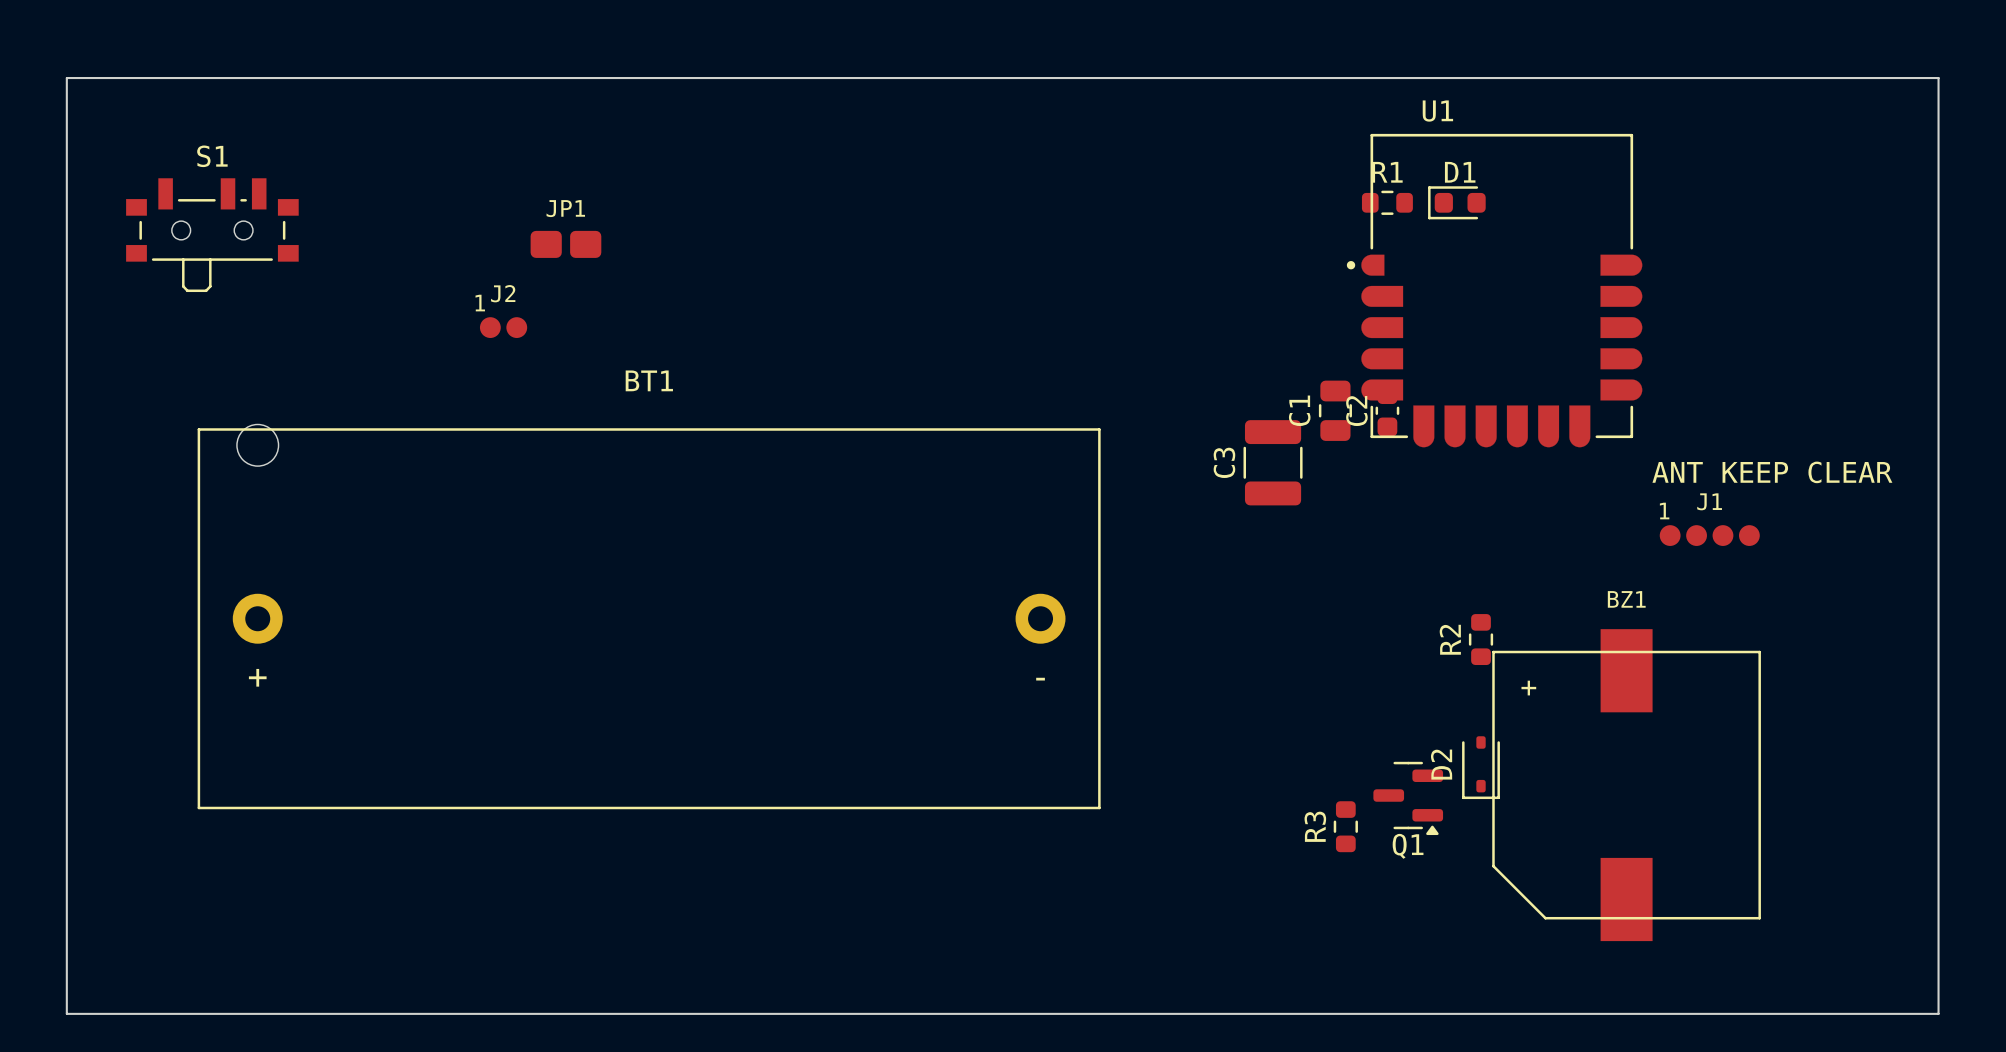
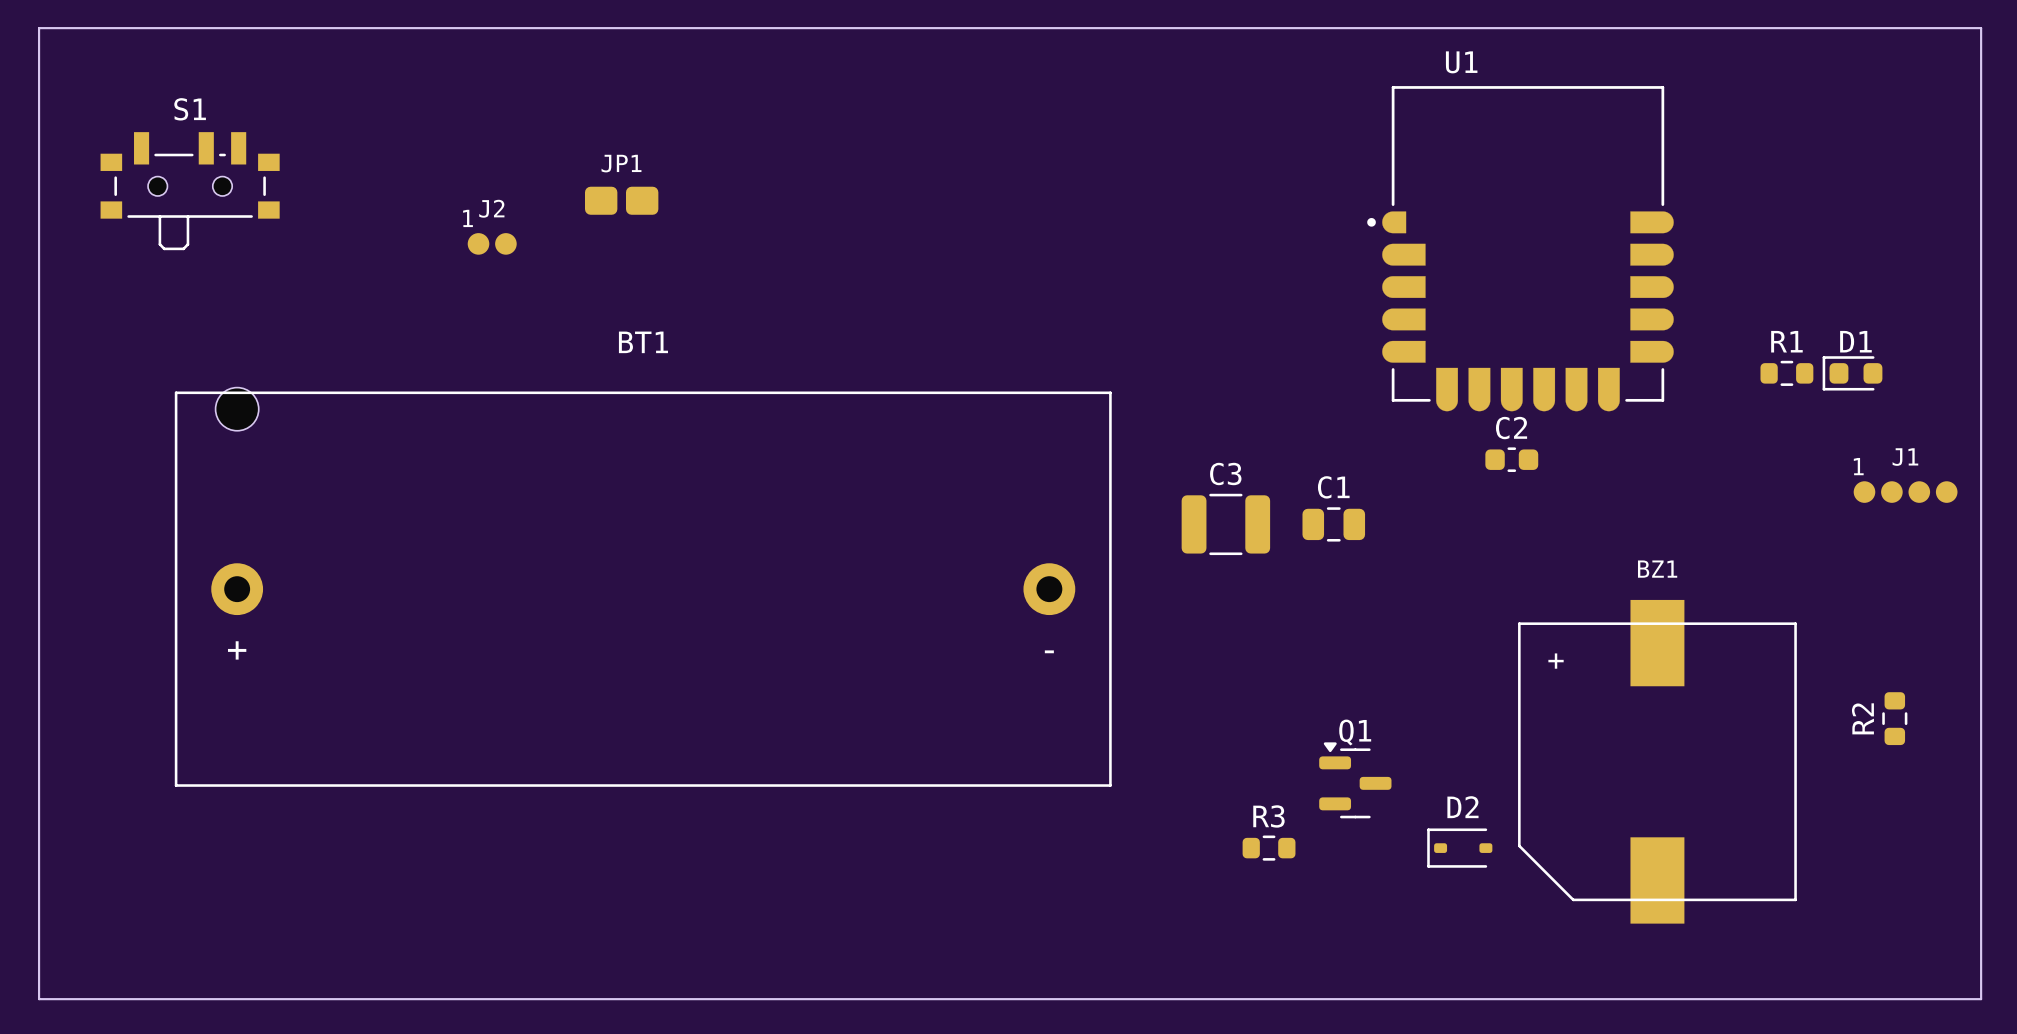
R1 position: (1387, 202) -> (1786, 373)
D1 position: (1456, 202) -> (1852, 373)
JP1 position: (565, 244) -> (621, 200)
J2 position: (503, 327) -> (492, 243)
C1 rotation: 0° (1335, 410) -> 90° clockwise (1333, 524)
C1 position: (1335, 410) -> (1333, 524)
C2 rotation: 0° (1387, 410) -> 90° clockwise (1511, 459)
C2 position: (1387, 410) -> (1511, 459)
C3 rotation: 0° (1273, 462) -> 90° clockwise (1225, 524)
C3 position: (1273, 462) -> (1225, 524)
text: ANT KEEP CLEAR (1772, 472) -> none
J1 position: (1709, 535) -> (1905, 492)
R2 position: (1481, 639) -> (1894, 718)
D2 rotation: 0° (1481, 767) -> 90° clockwise (1459, 848)
D2 position: (1481, 767) -> (1459, 848)
Q1 rotation: 0° (1408, 798) -> 180° (1355, 780)
Q1 position: (1408, 798) -> (1355, 780)
R3 rotation: 0° (1345, 826) -> 90° clockwise (1269, 848)
R3 position: (1345, 826) -> (1269, 848)

